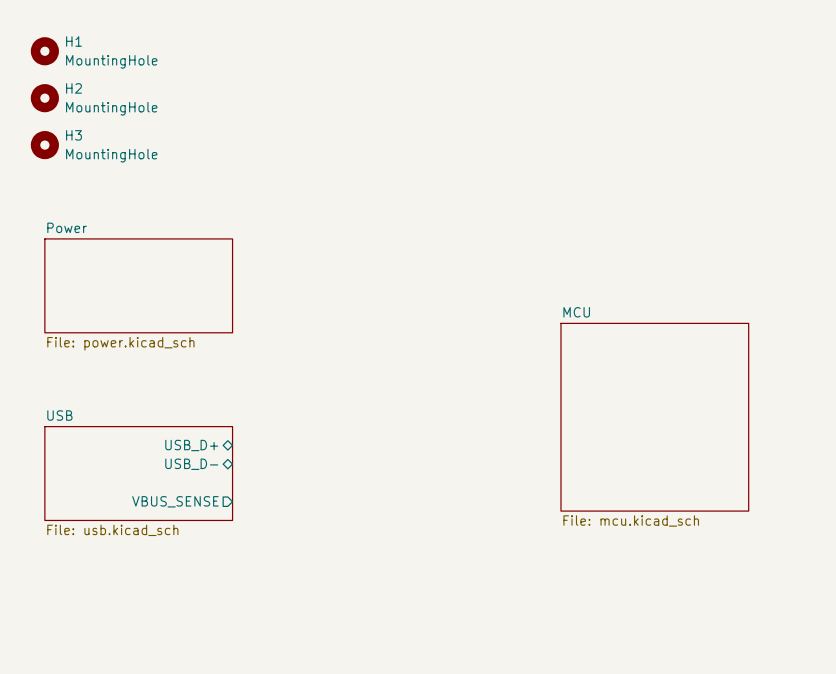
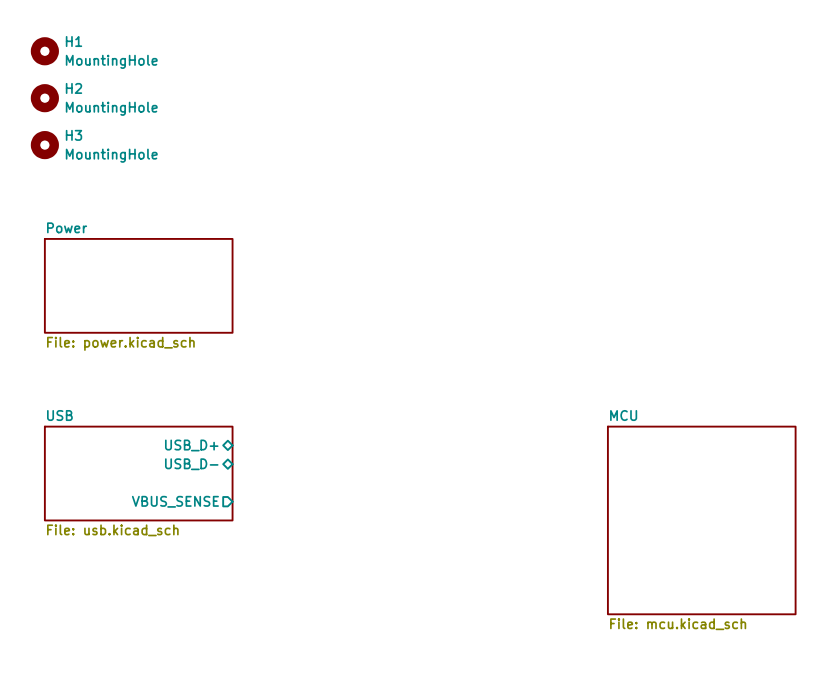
sheet MCU position: (654, 417) -> (701, 520)

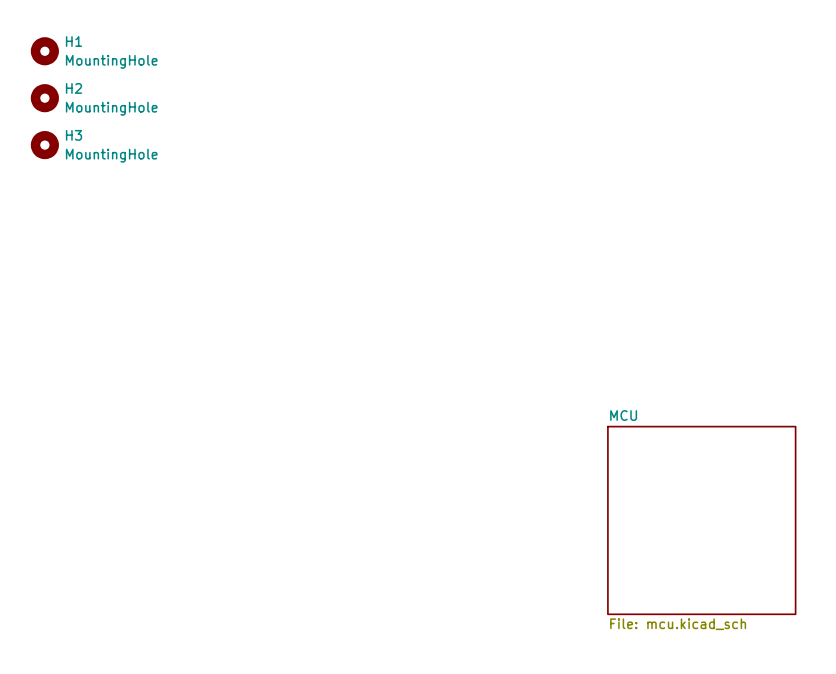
sheet Power: File: power.kicad_sch (138, 285) -> none
sheet pin: USB_D+ (191, 445) -> none
sheet pin: USB_D- (191, 464) -> none
sheet USB: File: usb.kicad_sch (138, 473) -> none
sheet pin: VBUS_SENSE (175, 501) -> none

